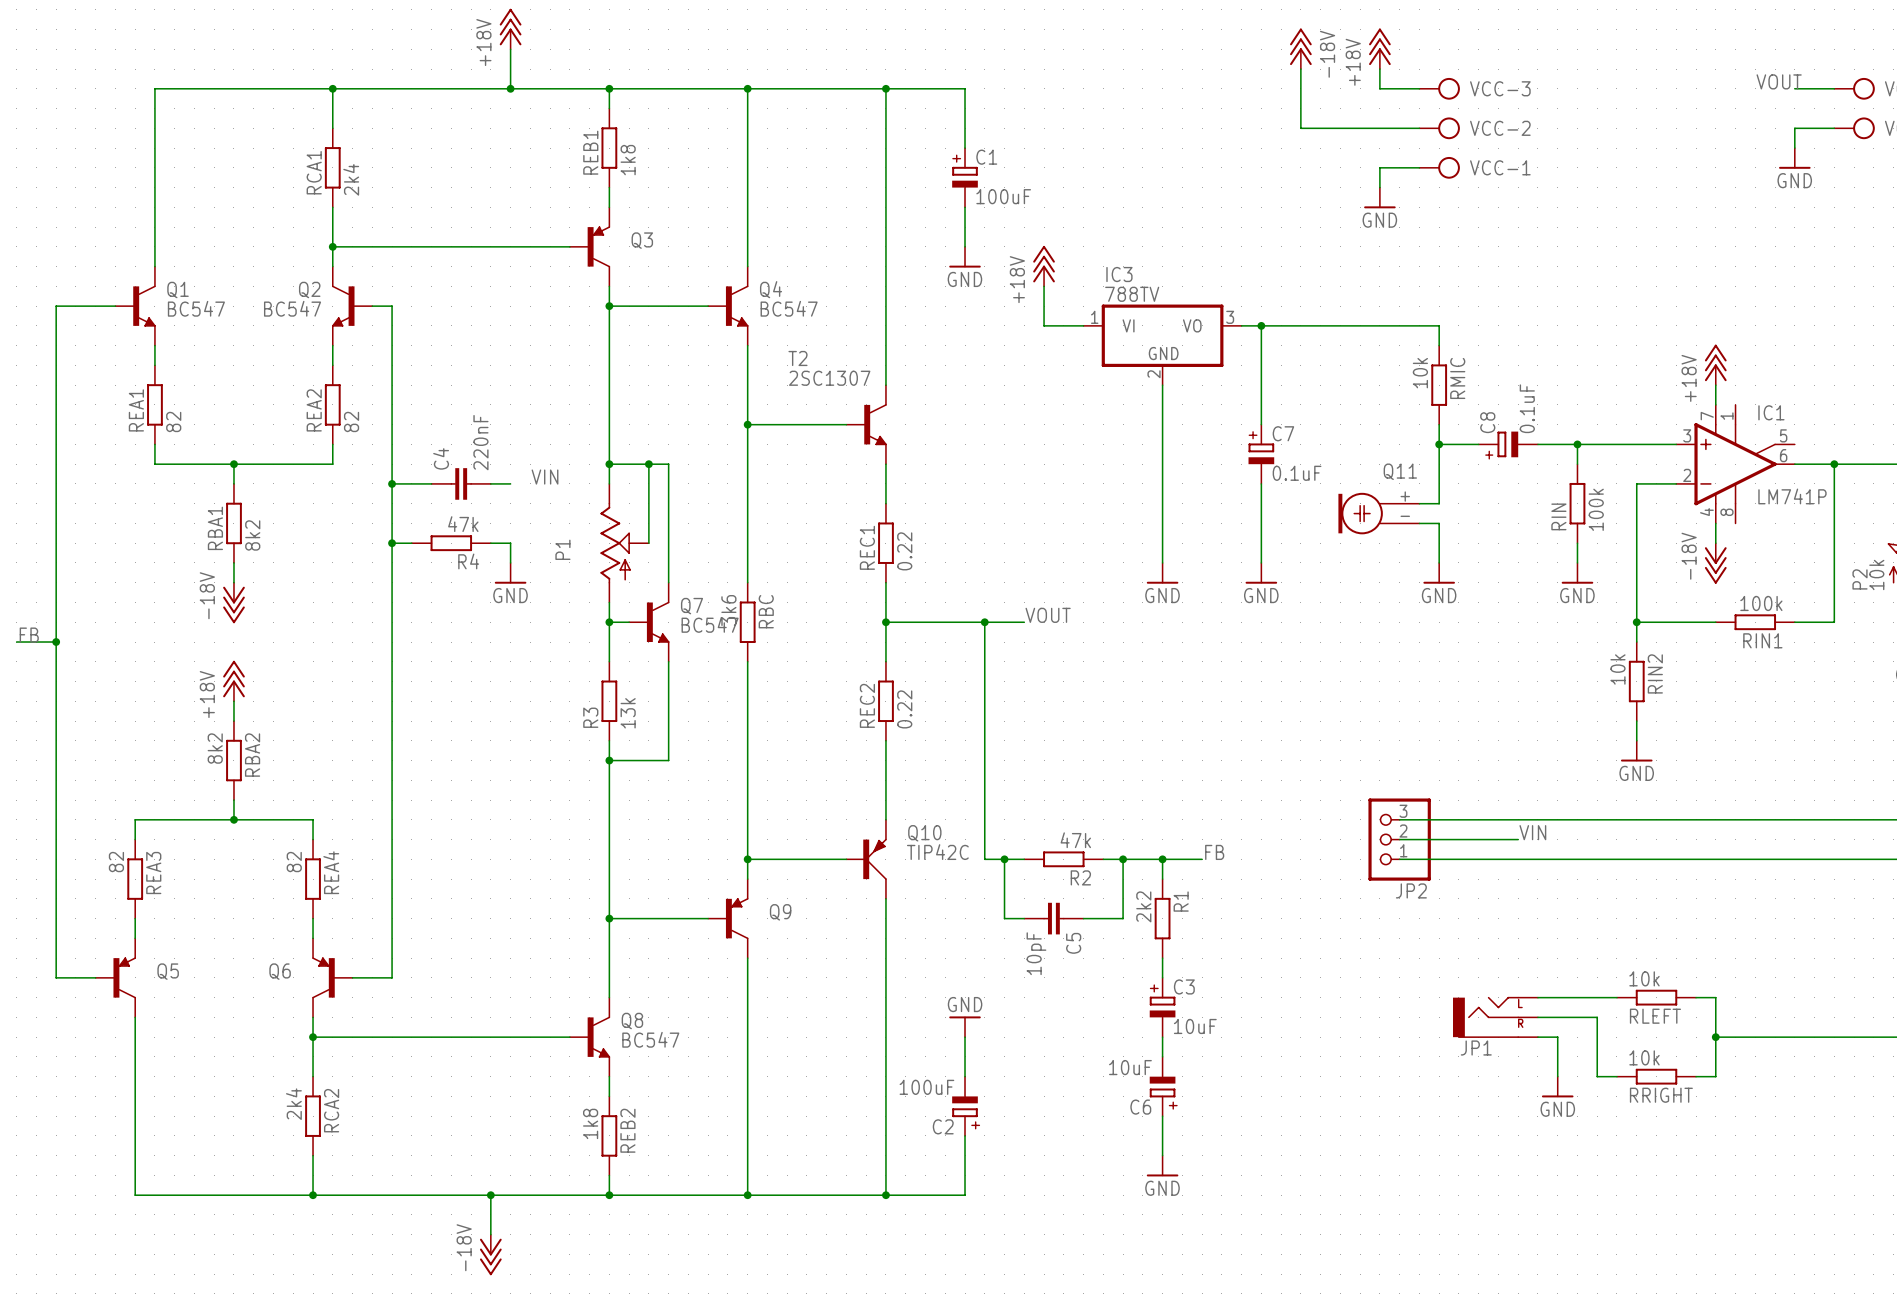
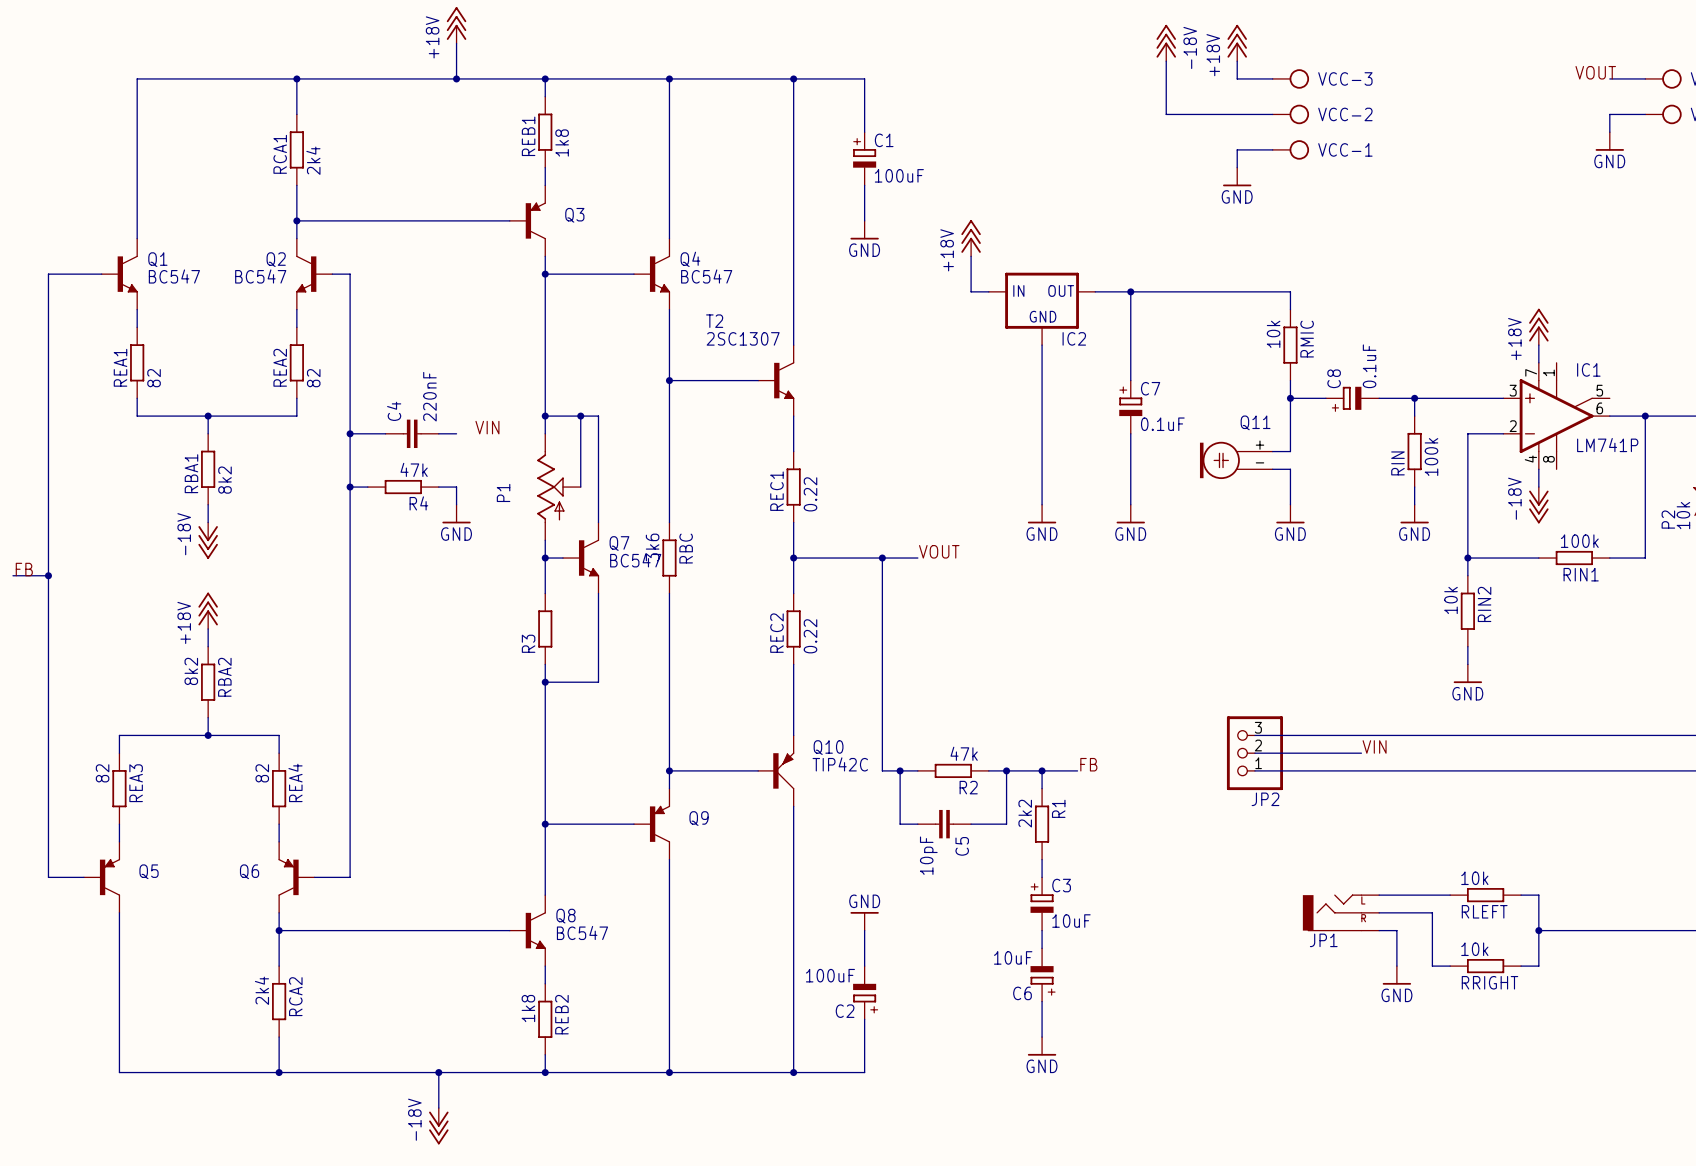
power symbol position: +18V (1044, 266) -> +18V (971, 238)
wire: (1044, 286) (1044, 325) (1083, 325) -> none
wire: none -> (971, 256) (971, 291) (988, 291)
IC3: 788TV (1162, 344) -> none
IC2: none -> (1042, 308)
R3 value: 13k (628, 713) -> none

